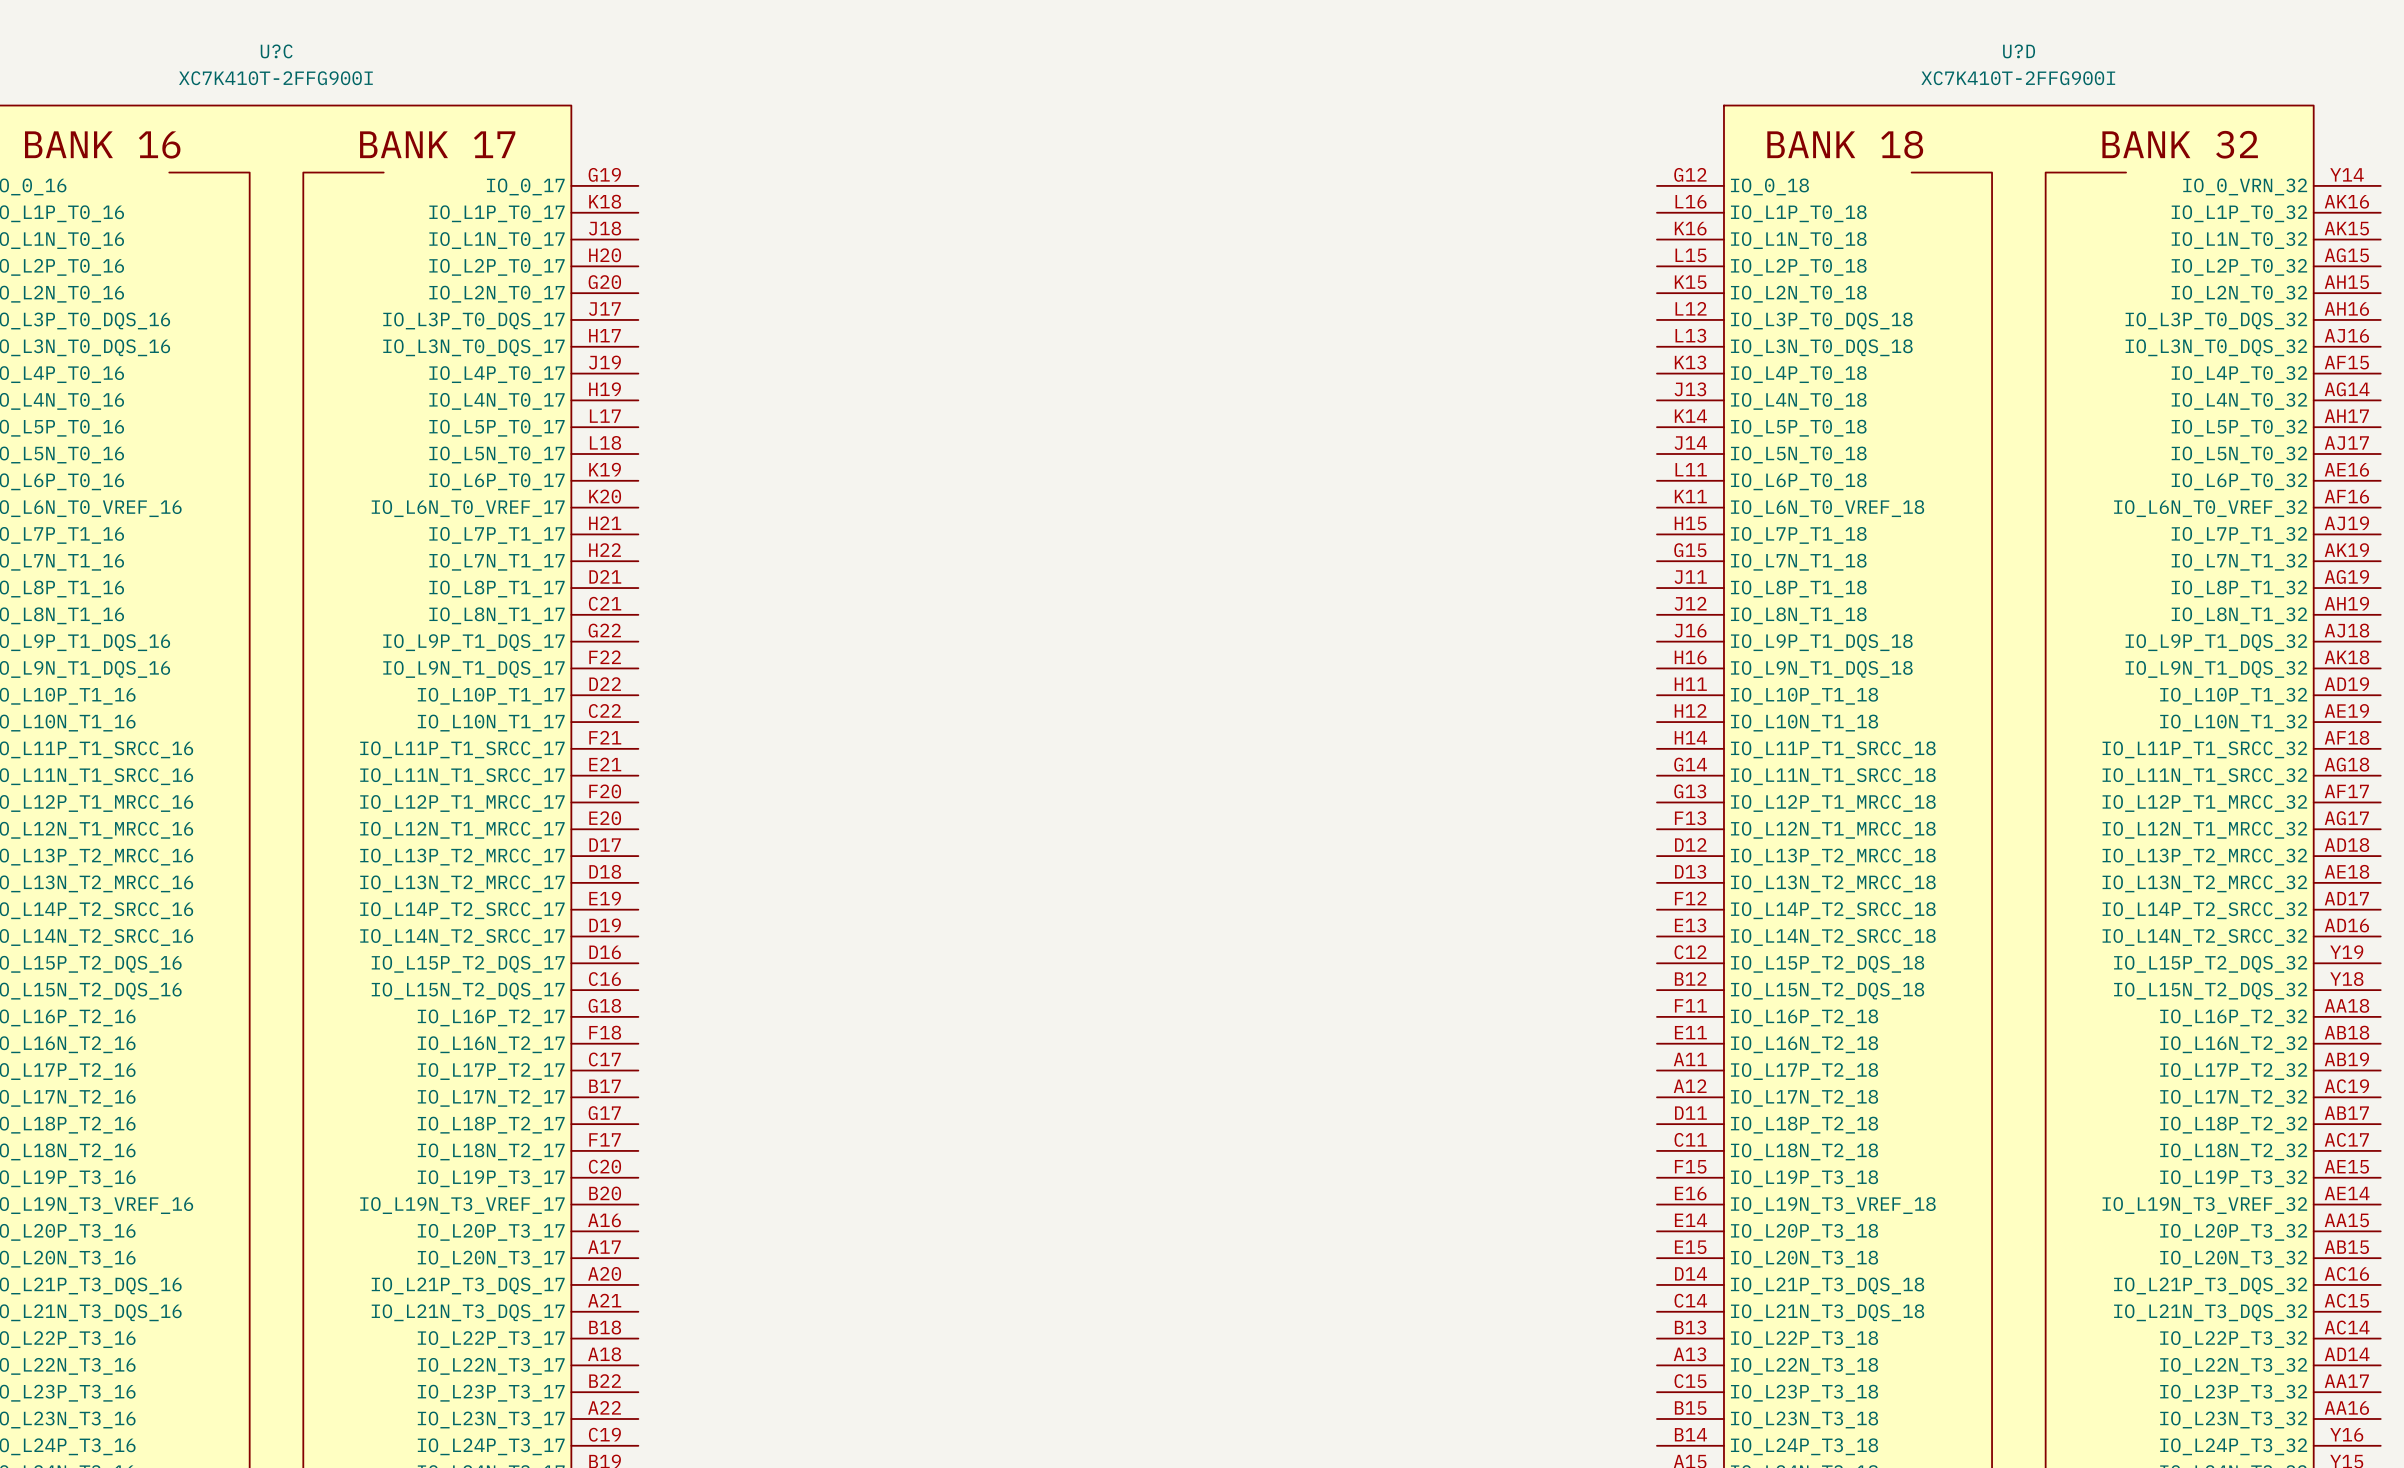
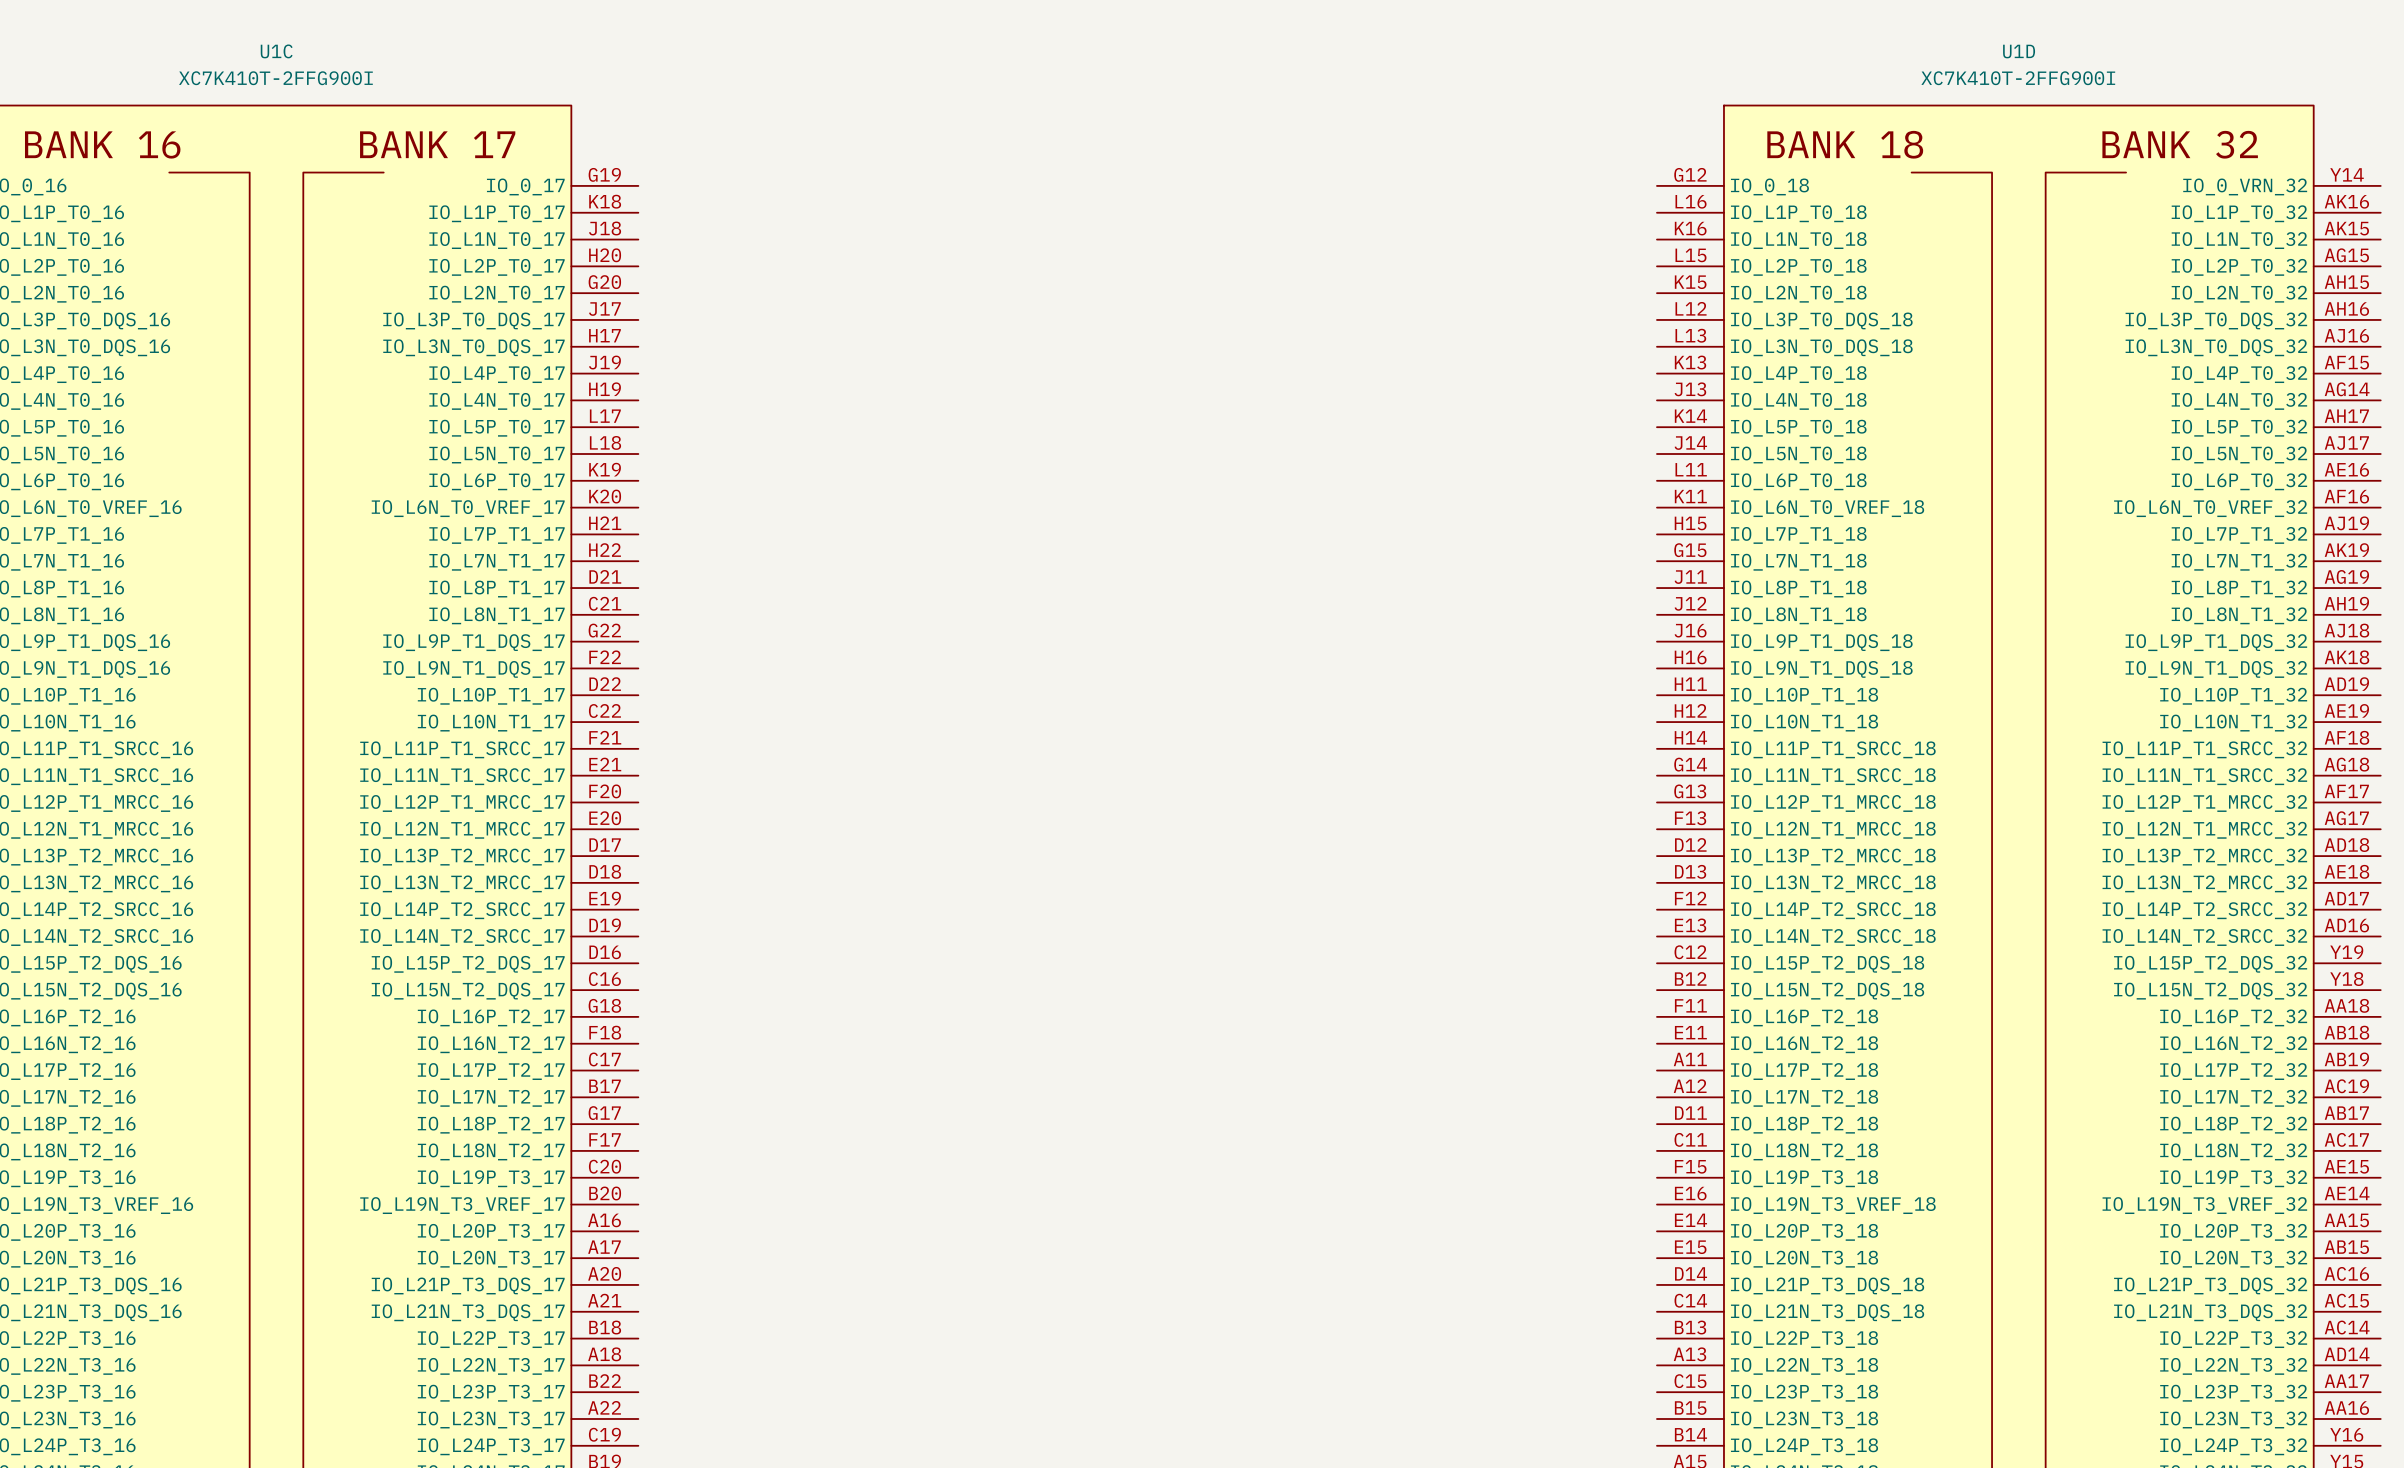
U?C name: U?C (276, 51) -> U1C (276, 51)
U?D name: U?D (2019, 51) -> U1D (2019, 51)

